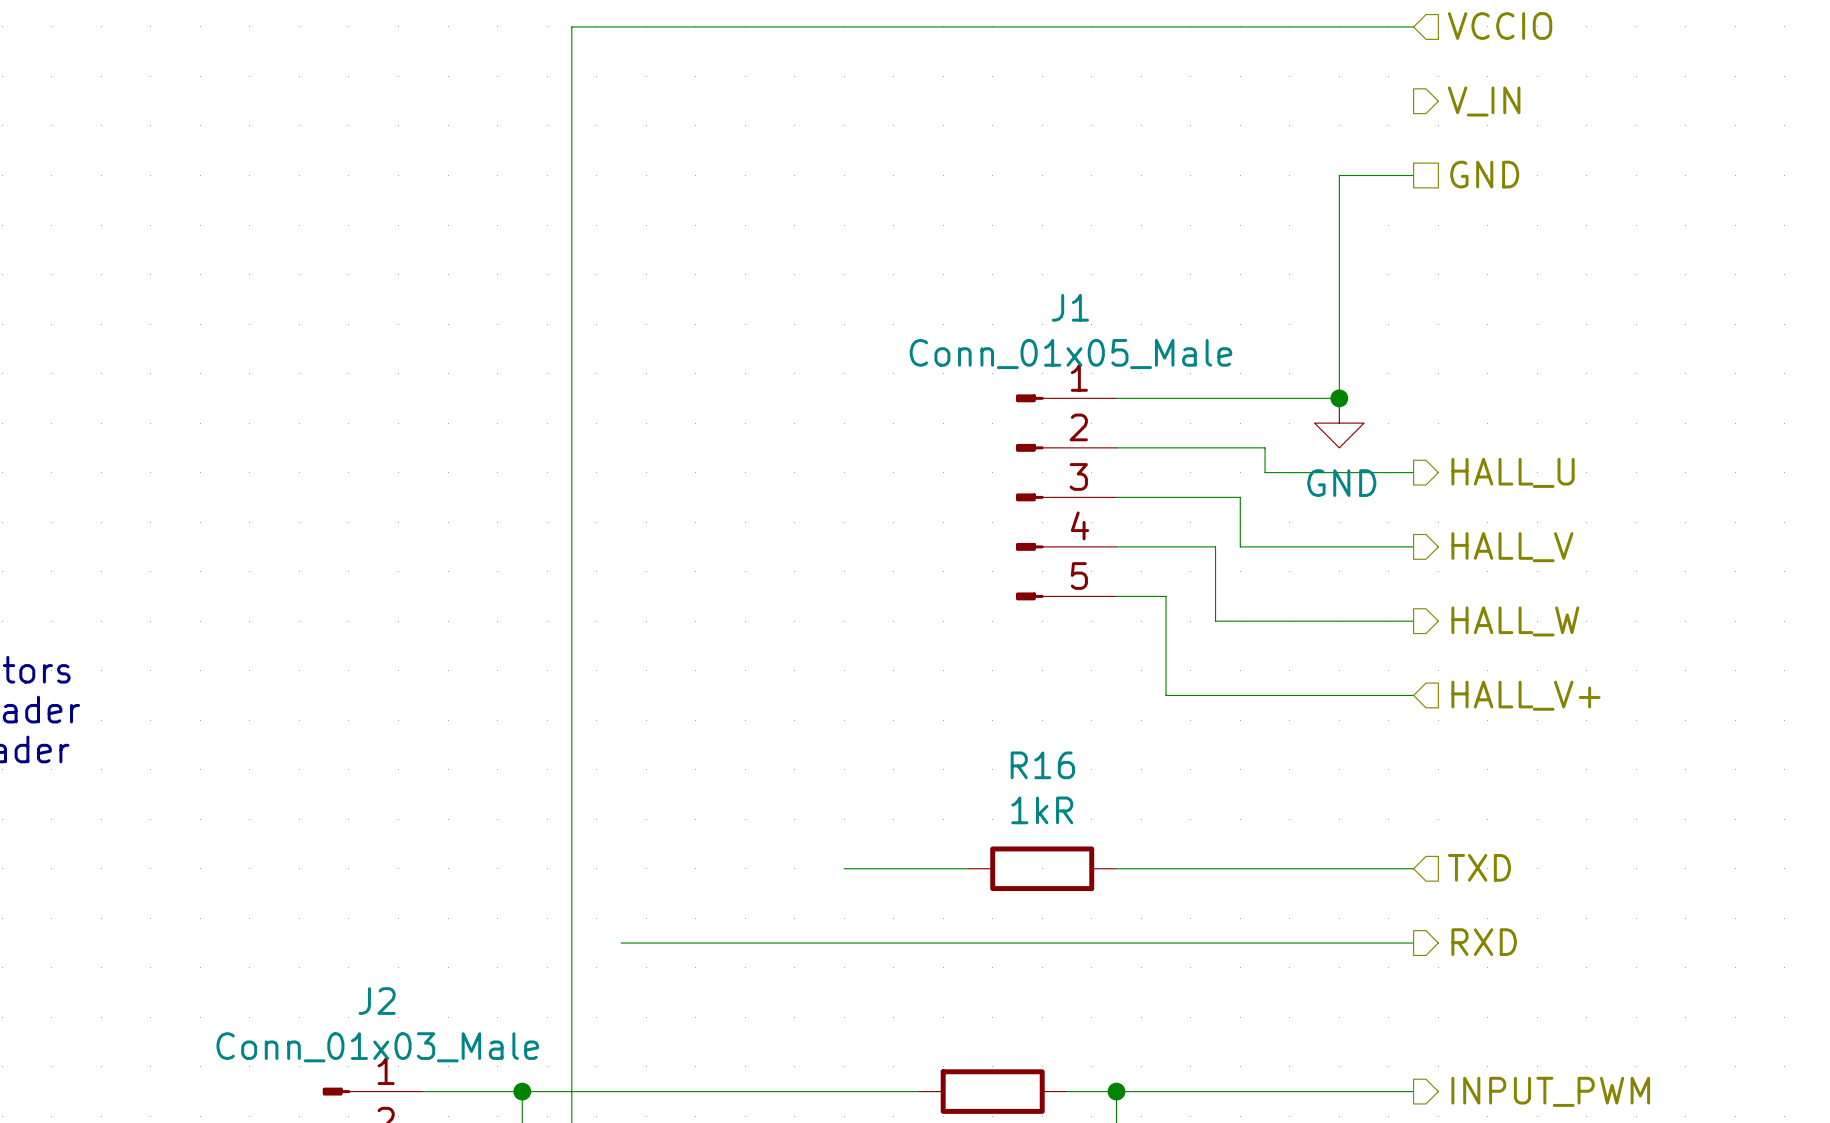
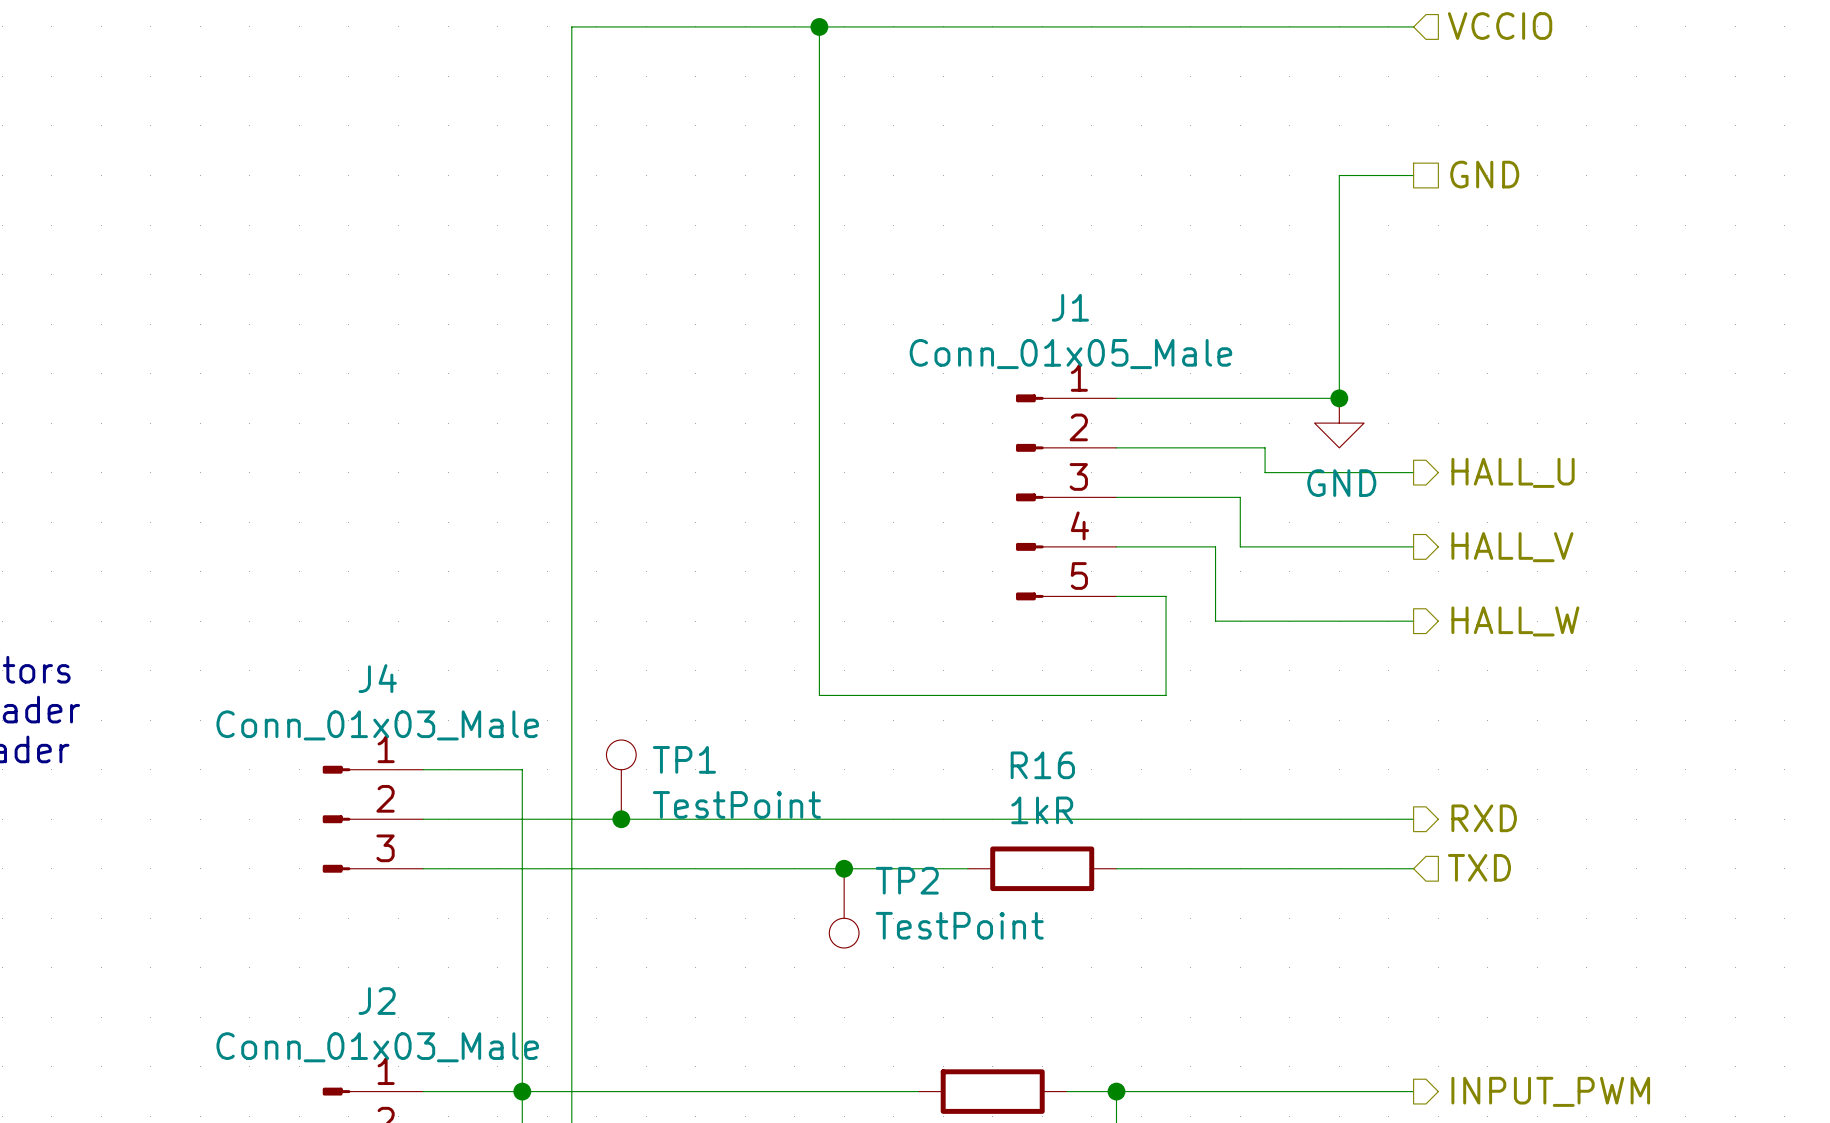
junction: none -> (819, 26)
hierarchical label: V_IN (1484, 101) -> none
wire: (1166, 695) (1413, 695) -> (1166, 695) (819, 695) (819, 26)
hierarchical label: HALL_V+ (1525, 695) -> none
wire: none -> (423, 769) (522, 769) (522, 1091)
TP1: none -> TestPoint (621, 779)
J4: none -> Conn_01x03_Male (372, 819)
wire: none -> (423, 819) (1413, 819)
junction: none -> (621, 819)
wire: none -> (423, 868) (844, 868)
junction: none -> (844, 868)
TP2: none -> TestPoint (844, 908)
hierarchical label position: RXD (1484, 942) -> RXD (1484, 818)
wire: (621, 943) (1413, 943) -> none

